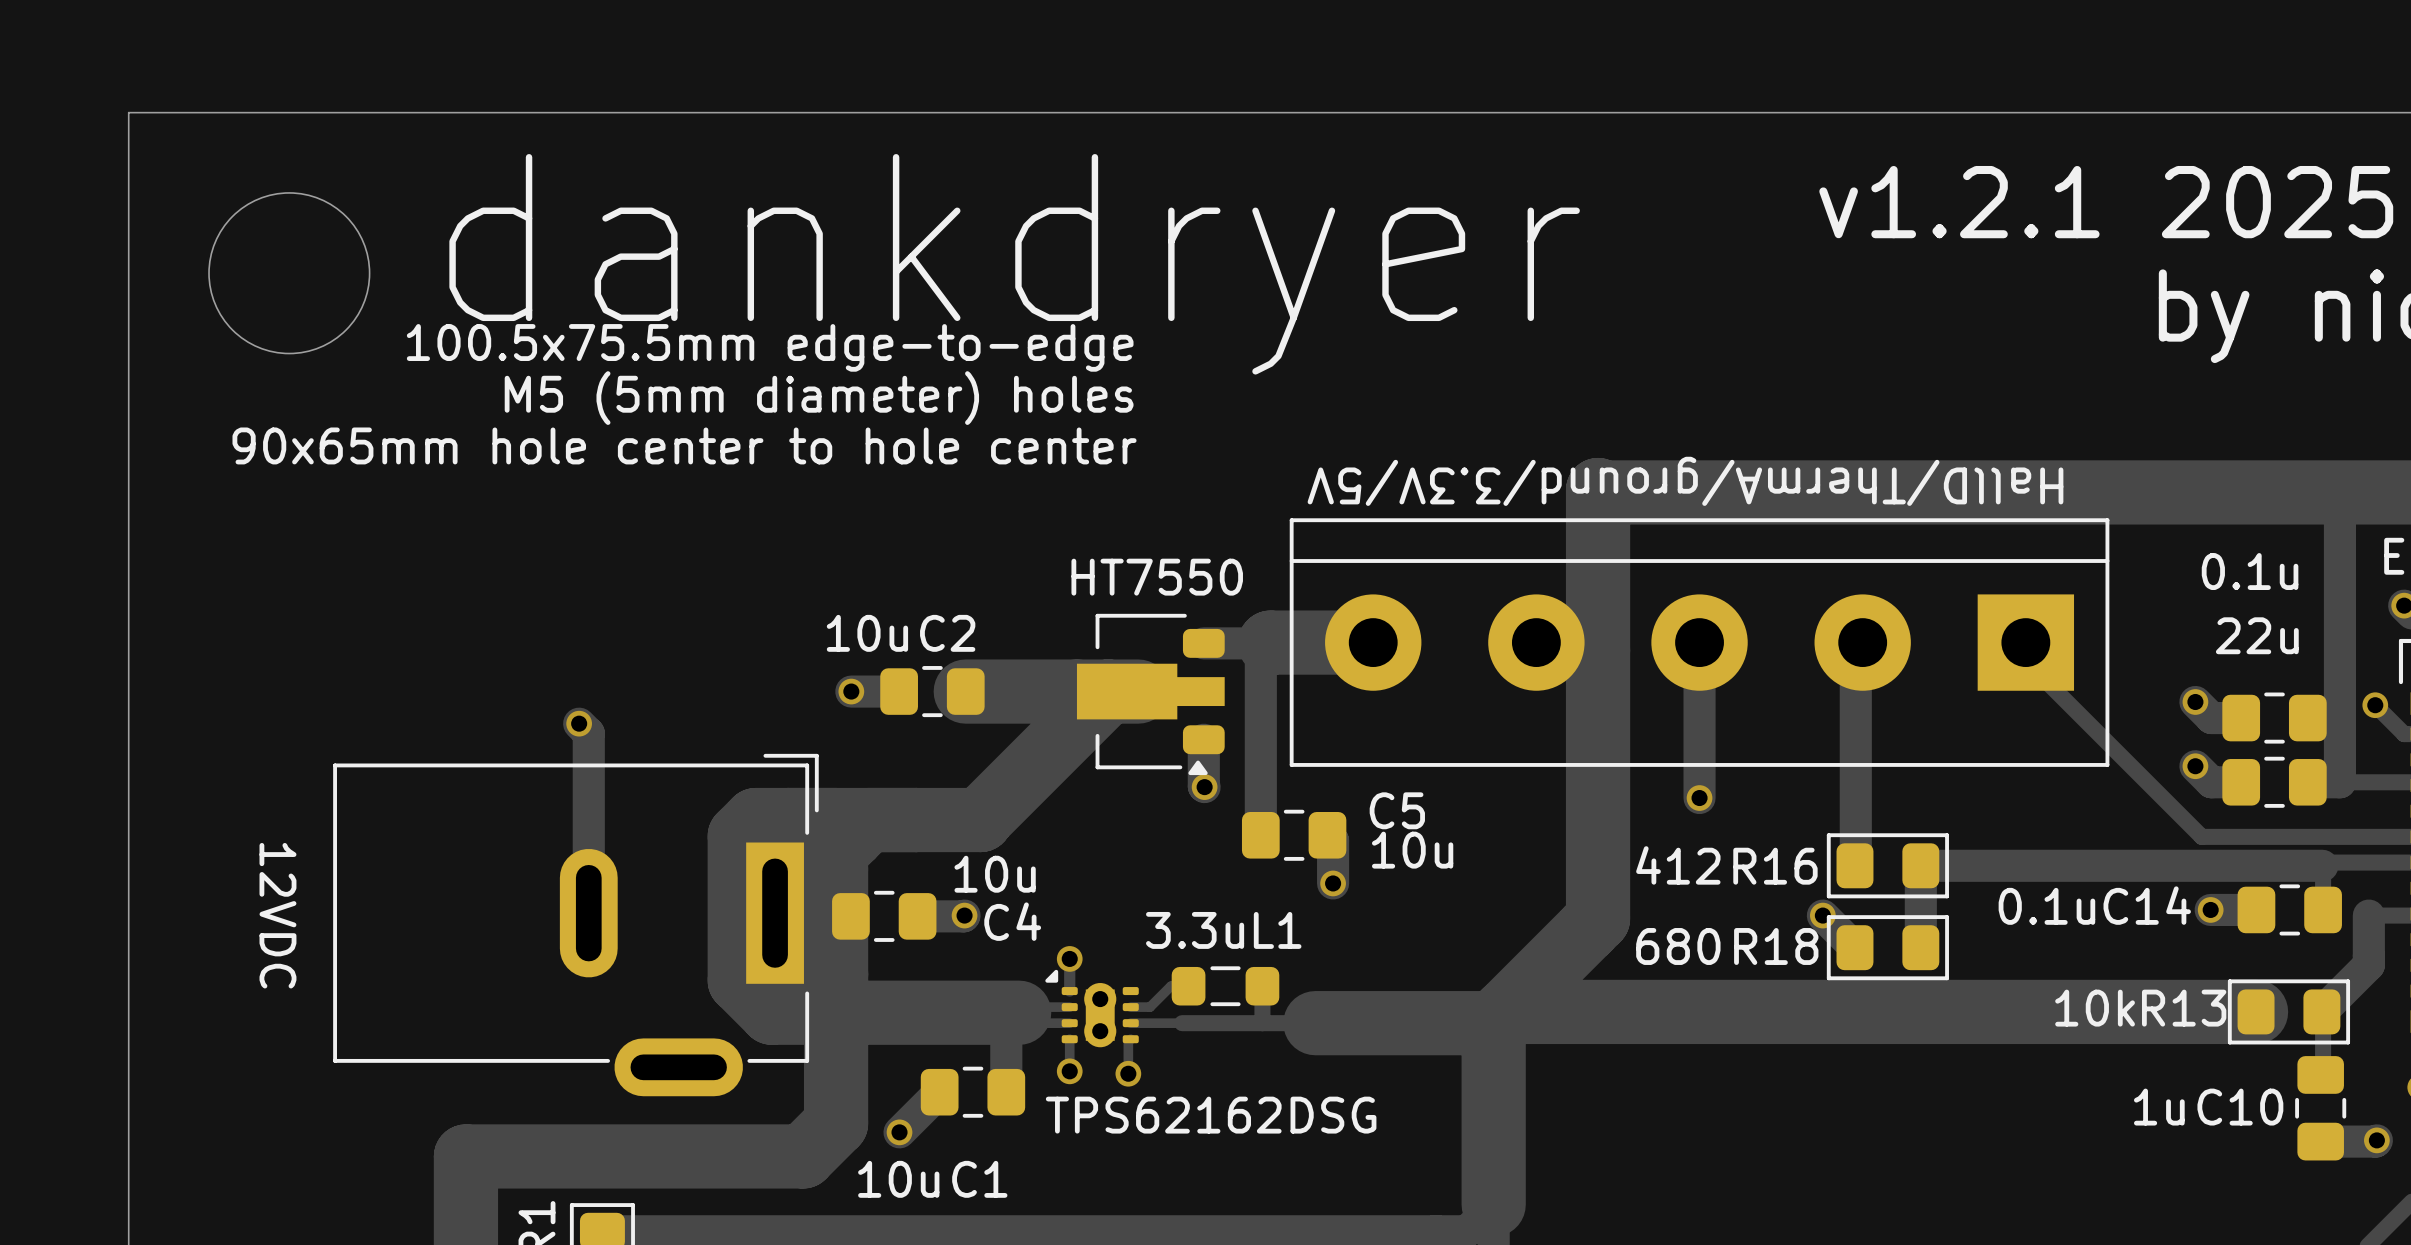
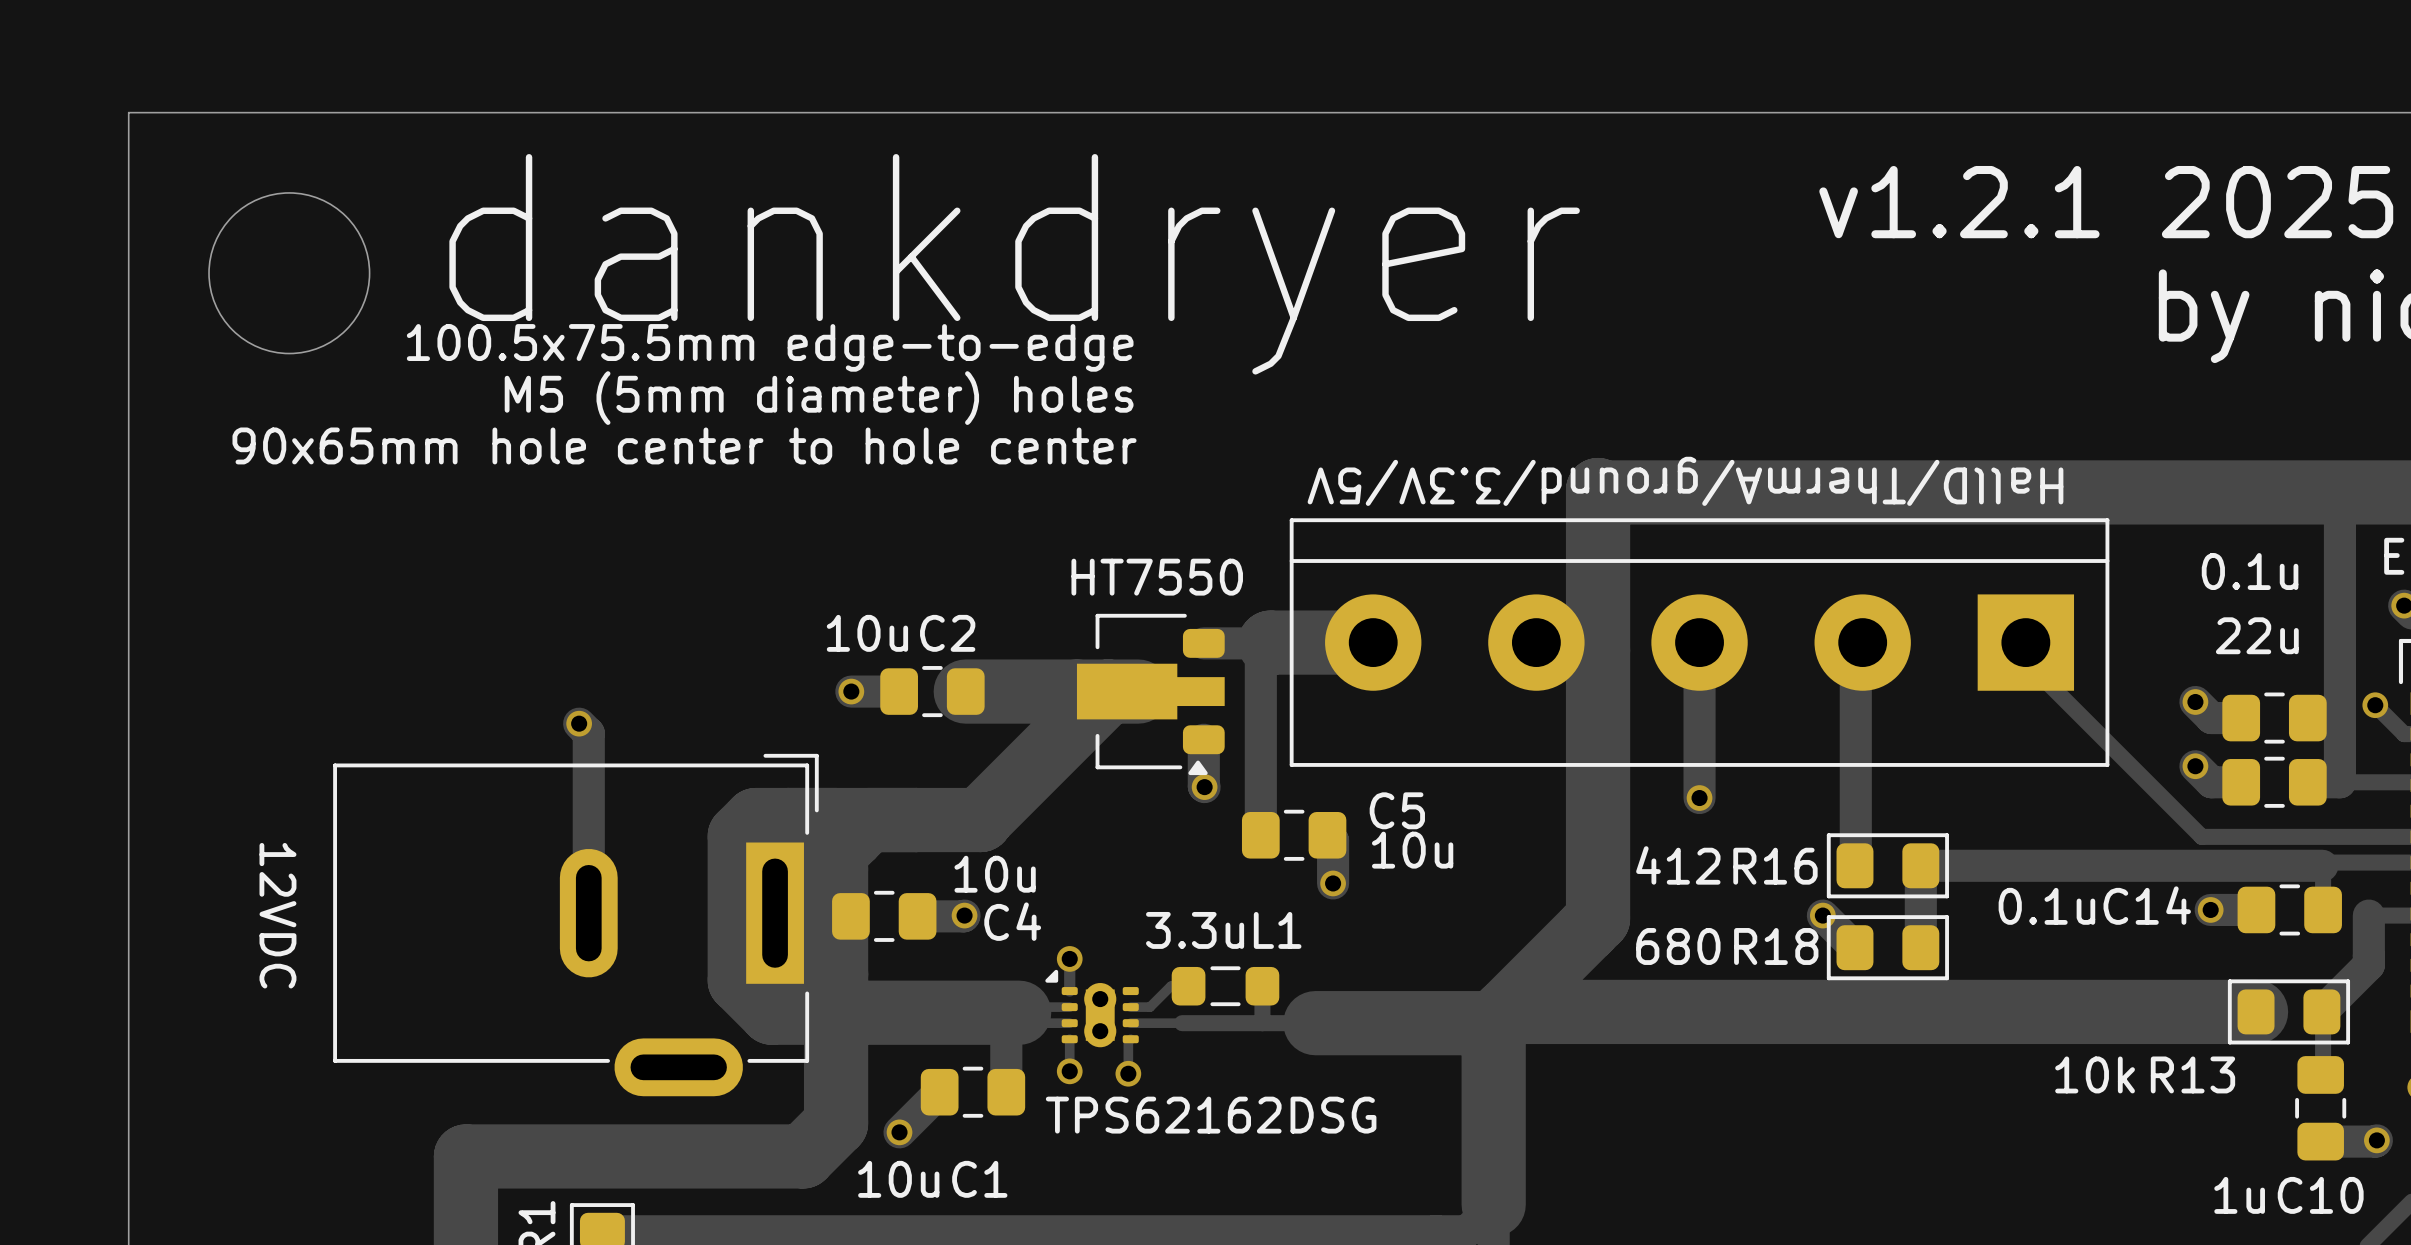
R13 value position: 10k (2095, 1008) -> 10k (2095, 1074)
R13 name position: R13 (2184, 1008) -> R13 (2192, 1074)
C10 value position: 1u (2159, 1107) -> 1u (2239, 1195)
C10 name position: C10 (2240, 1107) -> C10 (2320, 1195)

